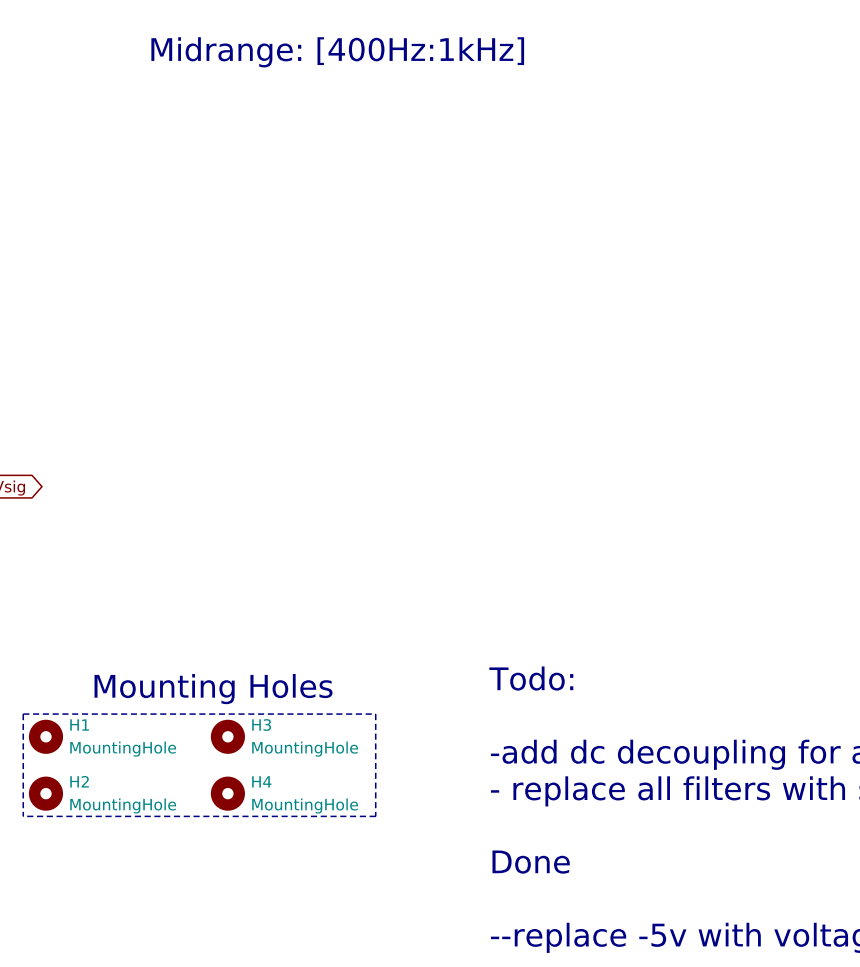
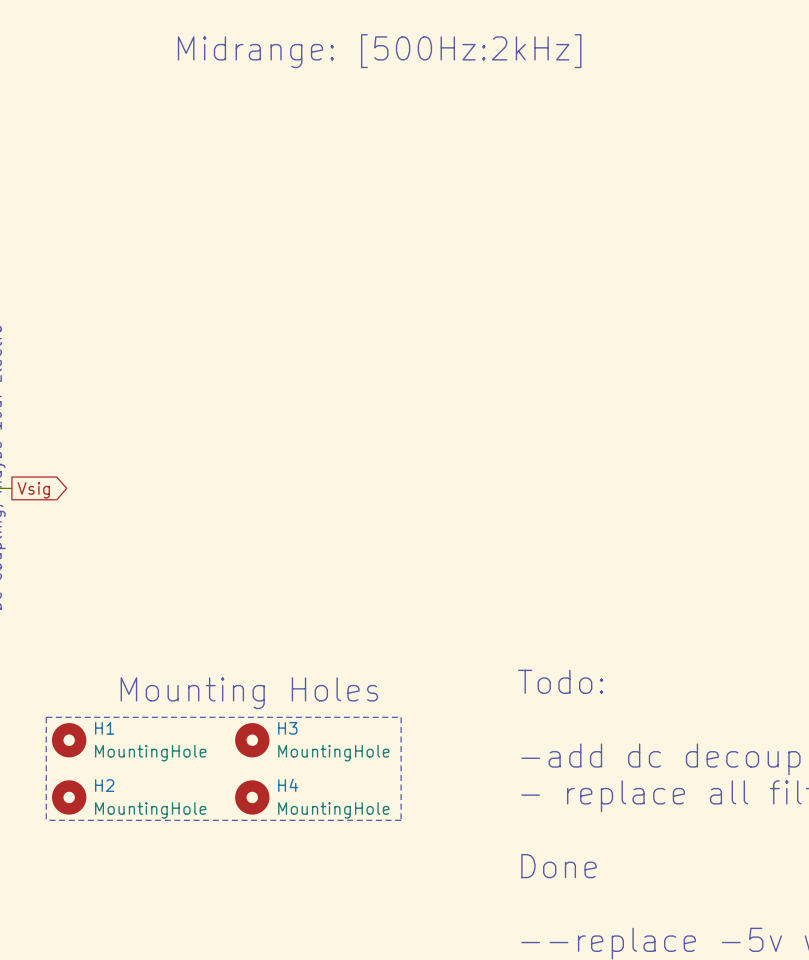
text: Midrange: [400Hz:1kHz] (337, 52) -> Midrange: [500Hz:2kHz] (379, 51)

